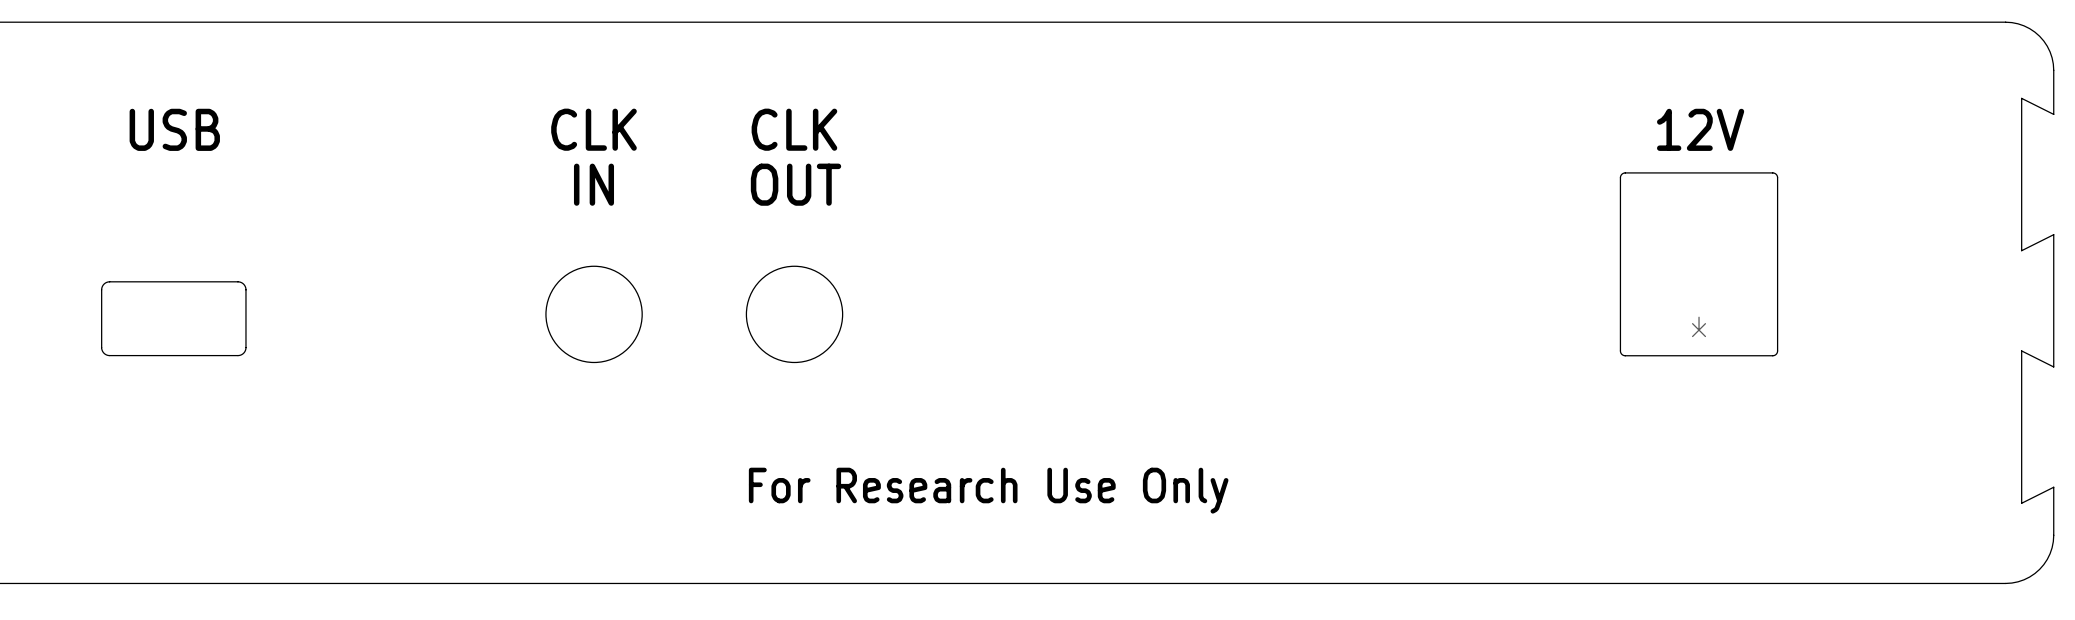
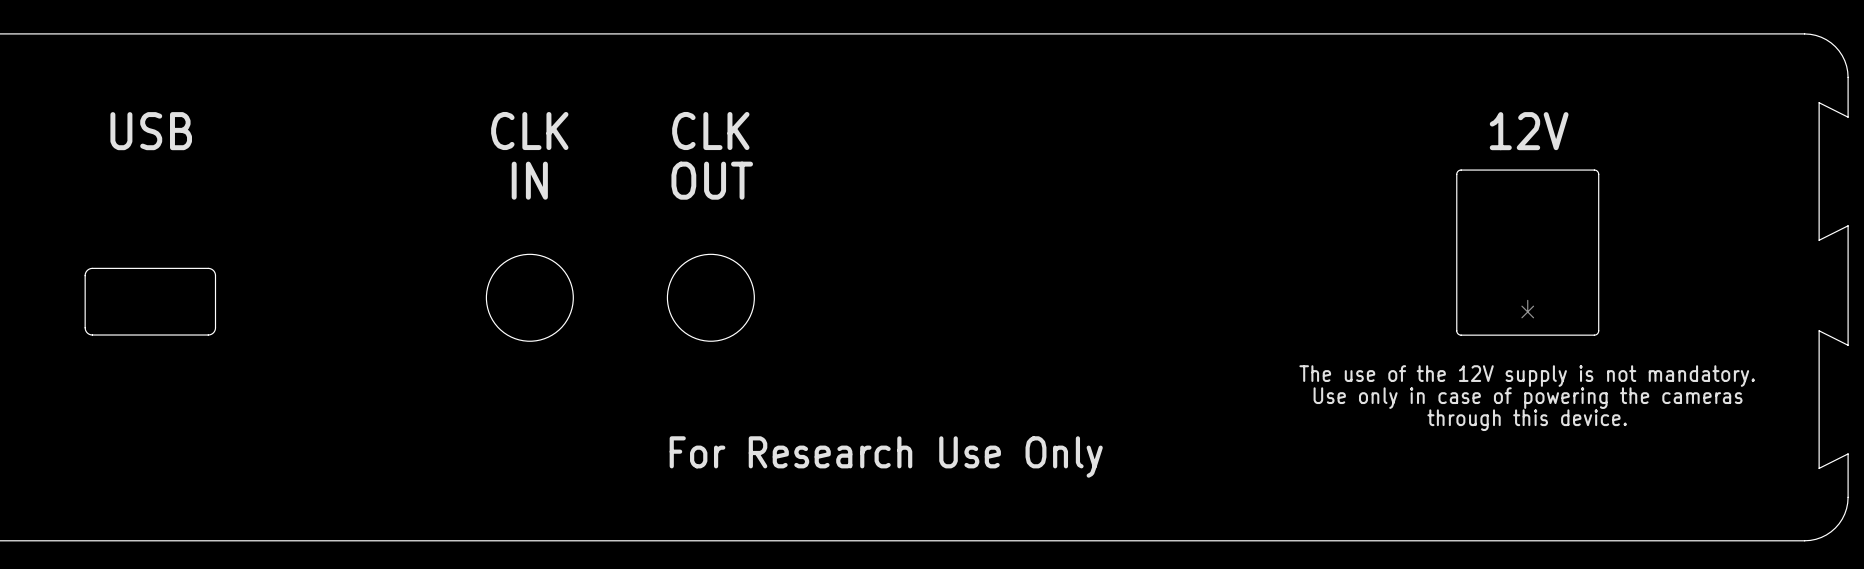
text: none -> The use of the 12V supply is not mandatory. (1527, 376)
text: none -> Use only in case of powering the cameras (1528, 398)
text: none -> through this device. (1527, 420)

